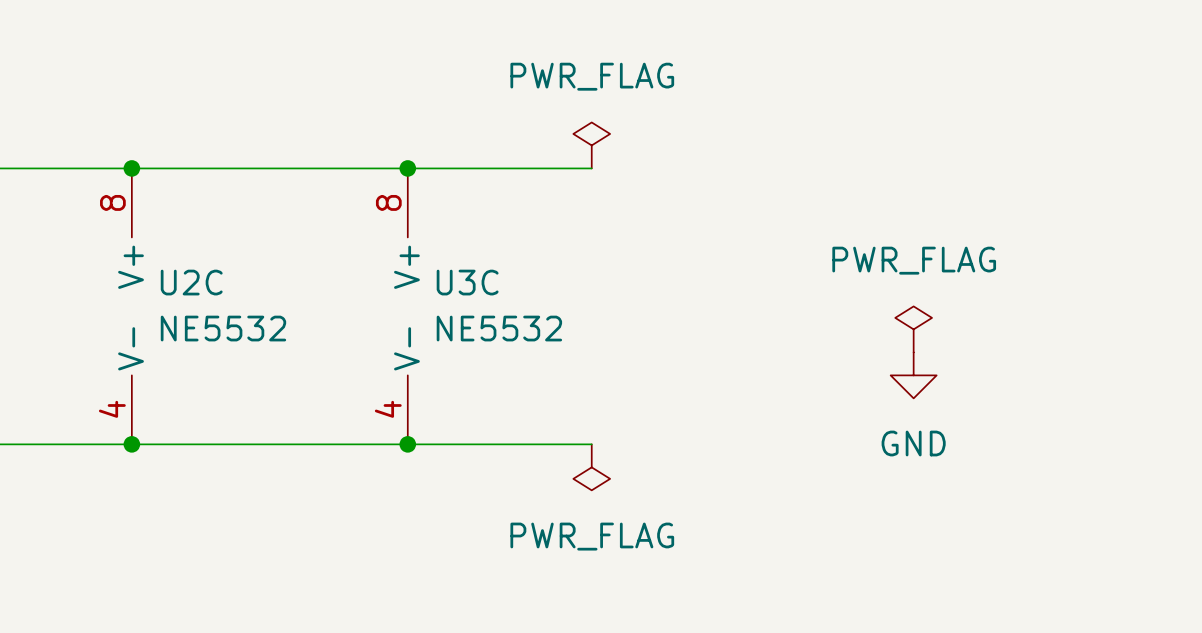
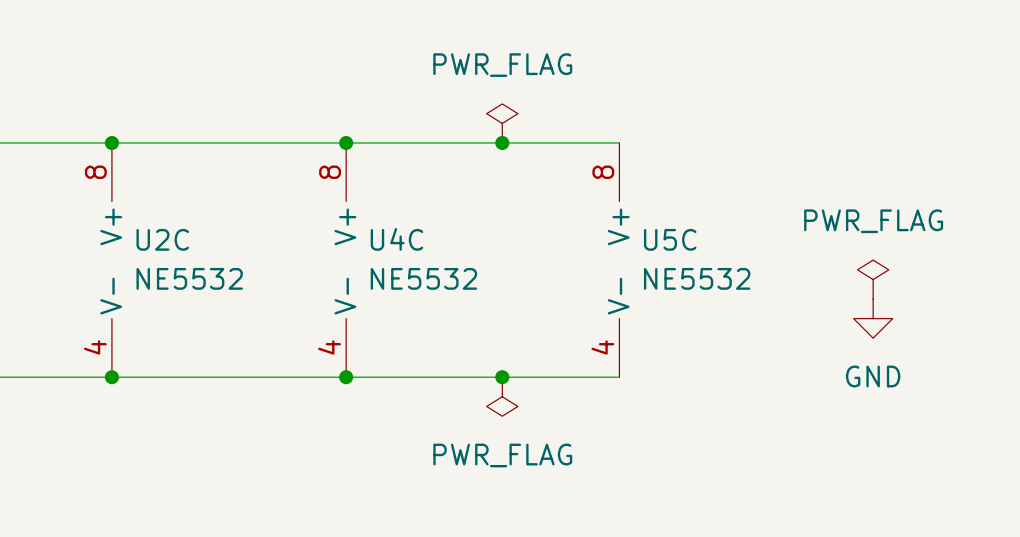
wire: none -> (502, 142) (619, 142)
junction: none -> (502, 142)
U3C name: U3C (467, 282) -> U4C (396, 239)
U5C: none -> NE5532 (619, 260)
power symbol position: PWR_FLAG (913, 329) -> PWR_FLAG (873, 279)
power symbol position: GND (913, 375) -> GND (873, 318)
wire: none -> (502, 377) (619, 377)
junction: none -> (502, 377)

